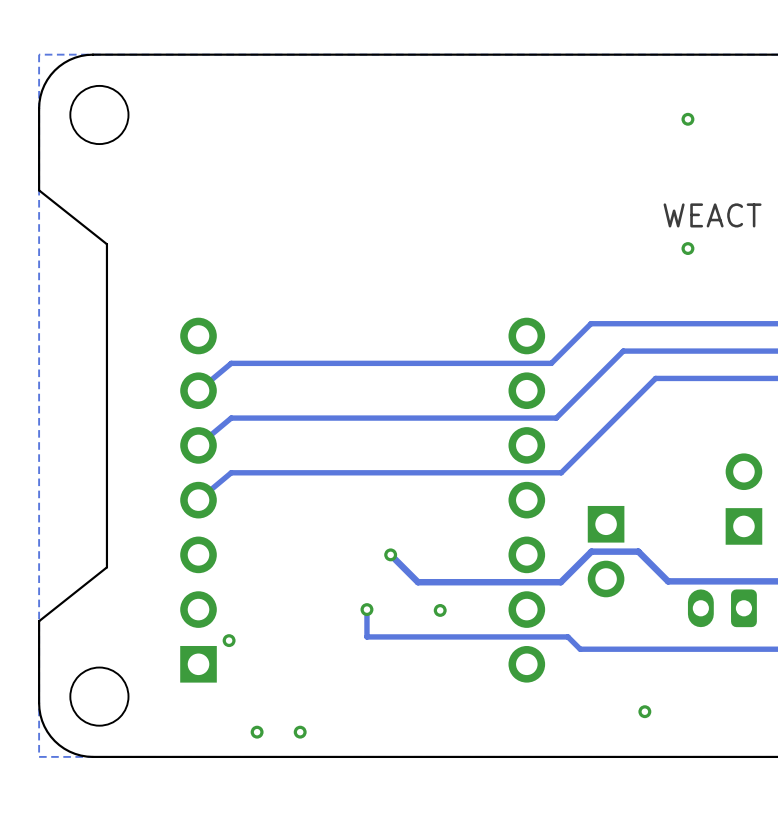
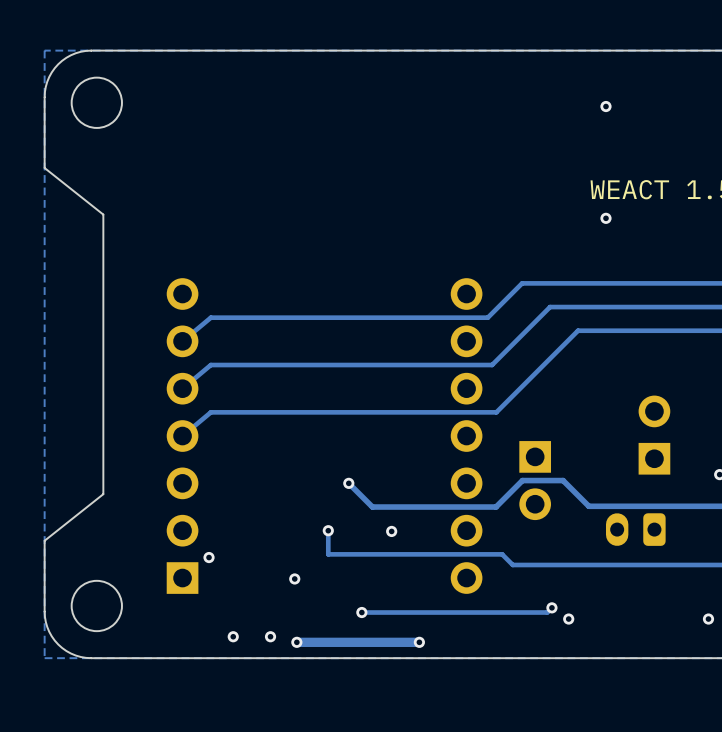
via: none -> (294, 578)
track: none -> (551, 607) (547, 612) (361, 612)
via: none -> (551, 607)
via: none -> (361, 612)
via: none -> (296, 642)
track: none -> (419, 642) (296, 642)
via: none -> (419, 642)

